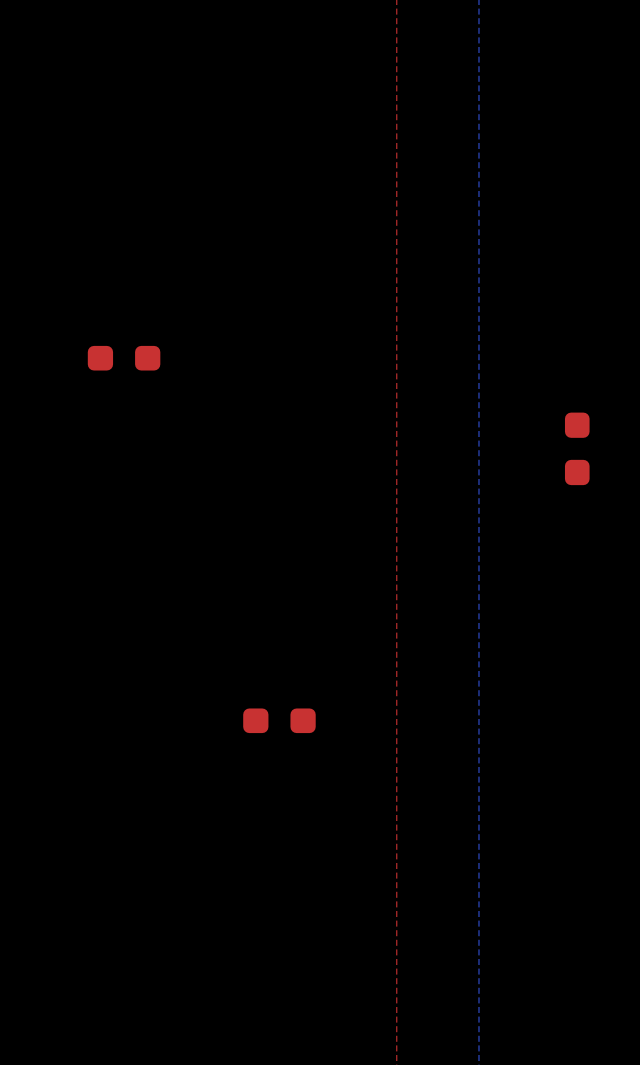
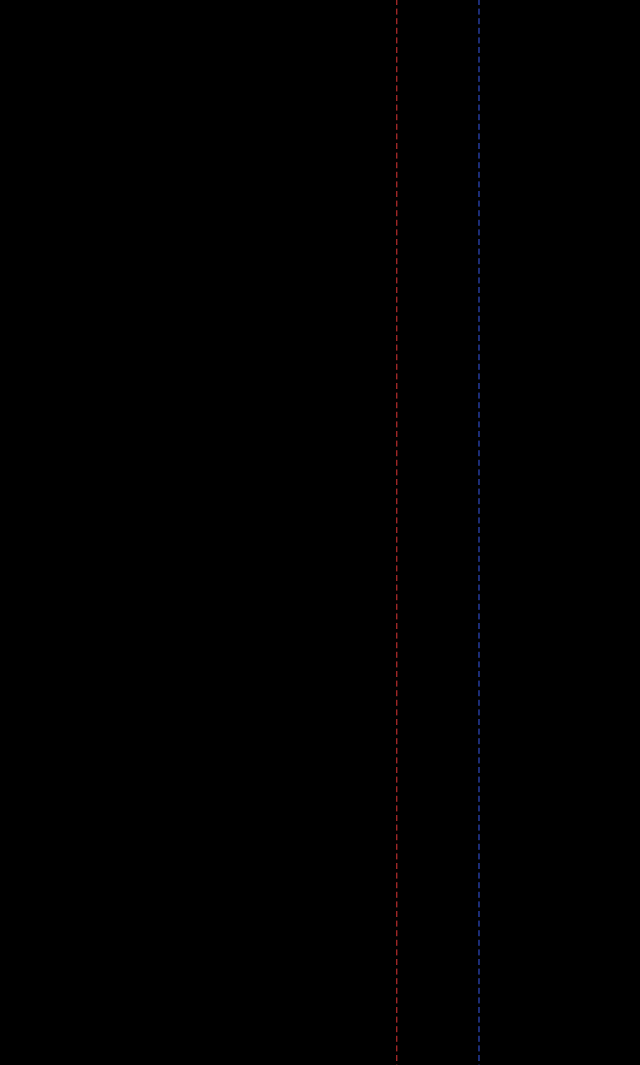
part: (124, 358) -> none
part: (577, 448) -> none
part: (279, 720) -> none

